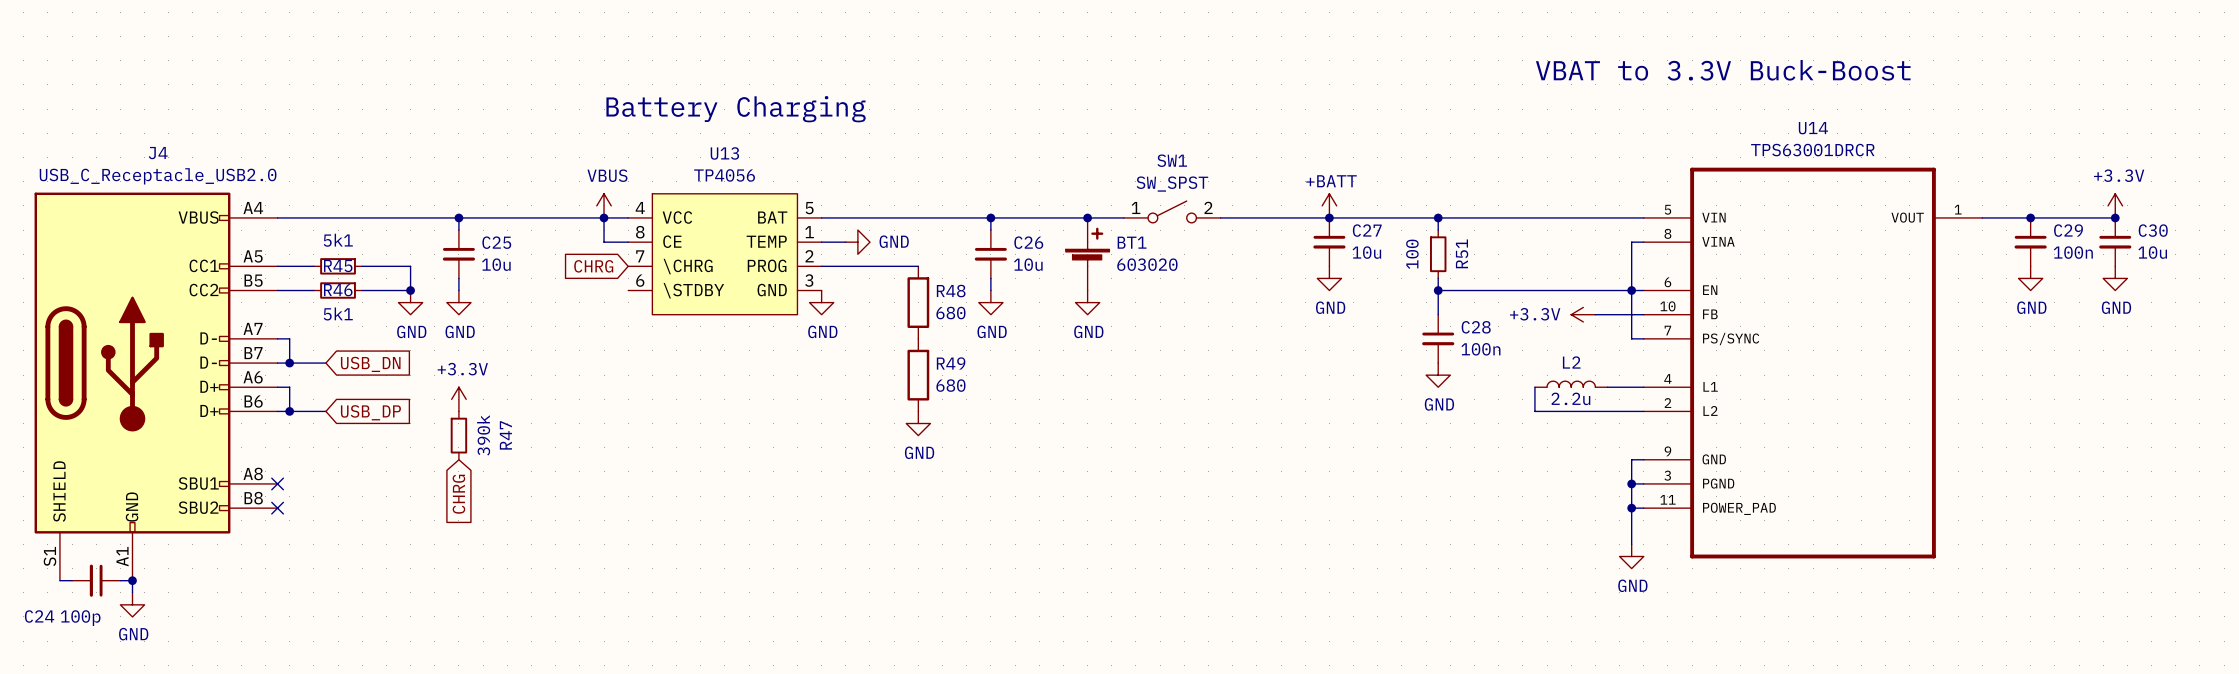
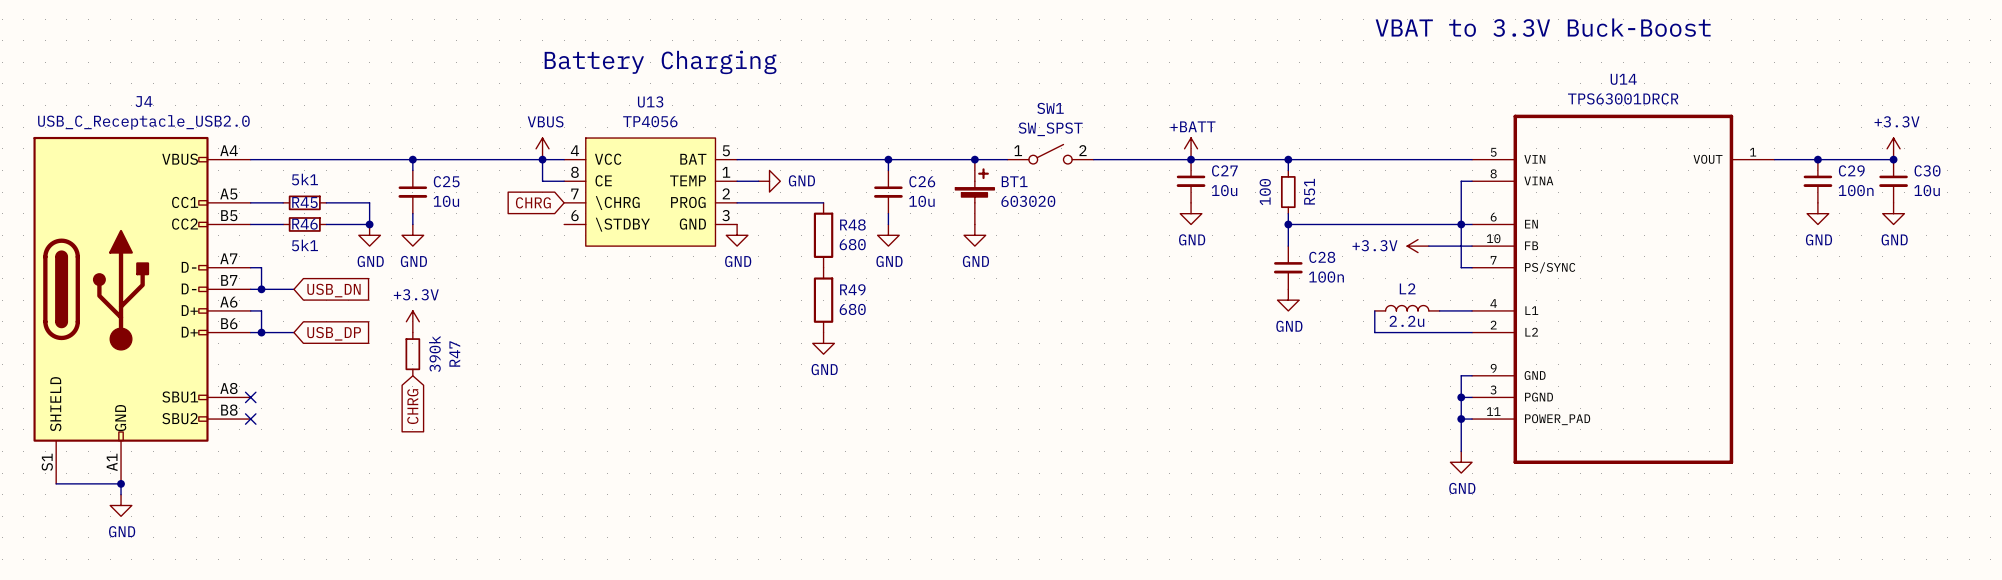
C24: 100p (96, 580) -> none

